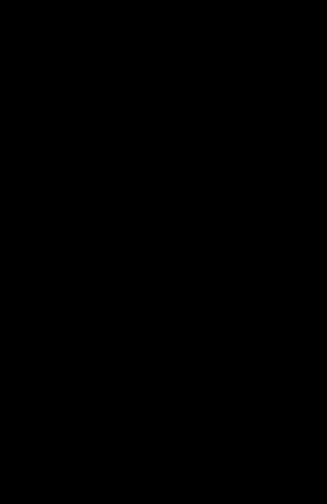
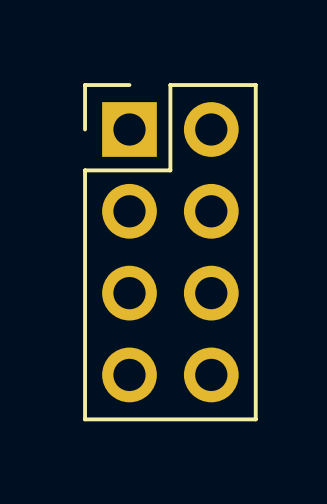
part: none -> (170, 252)

